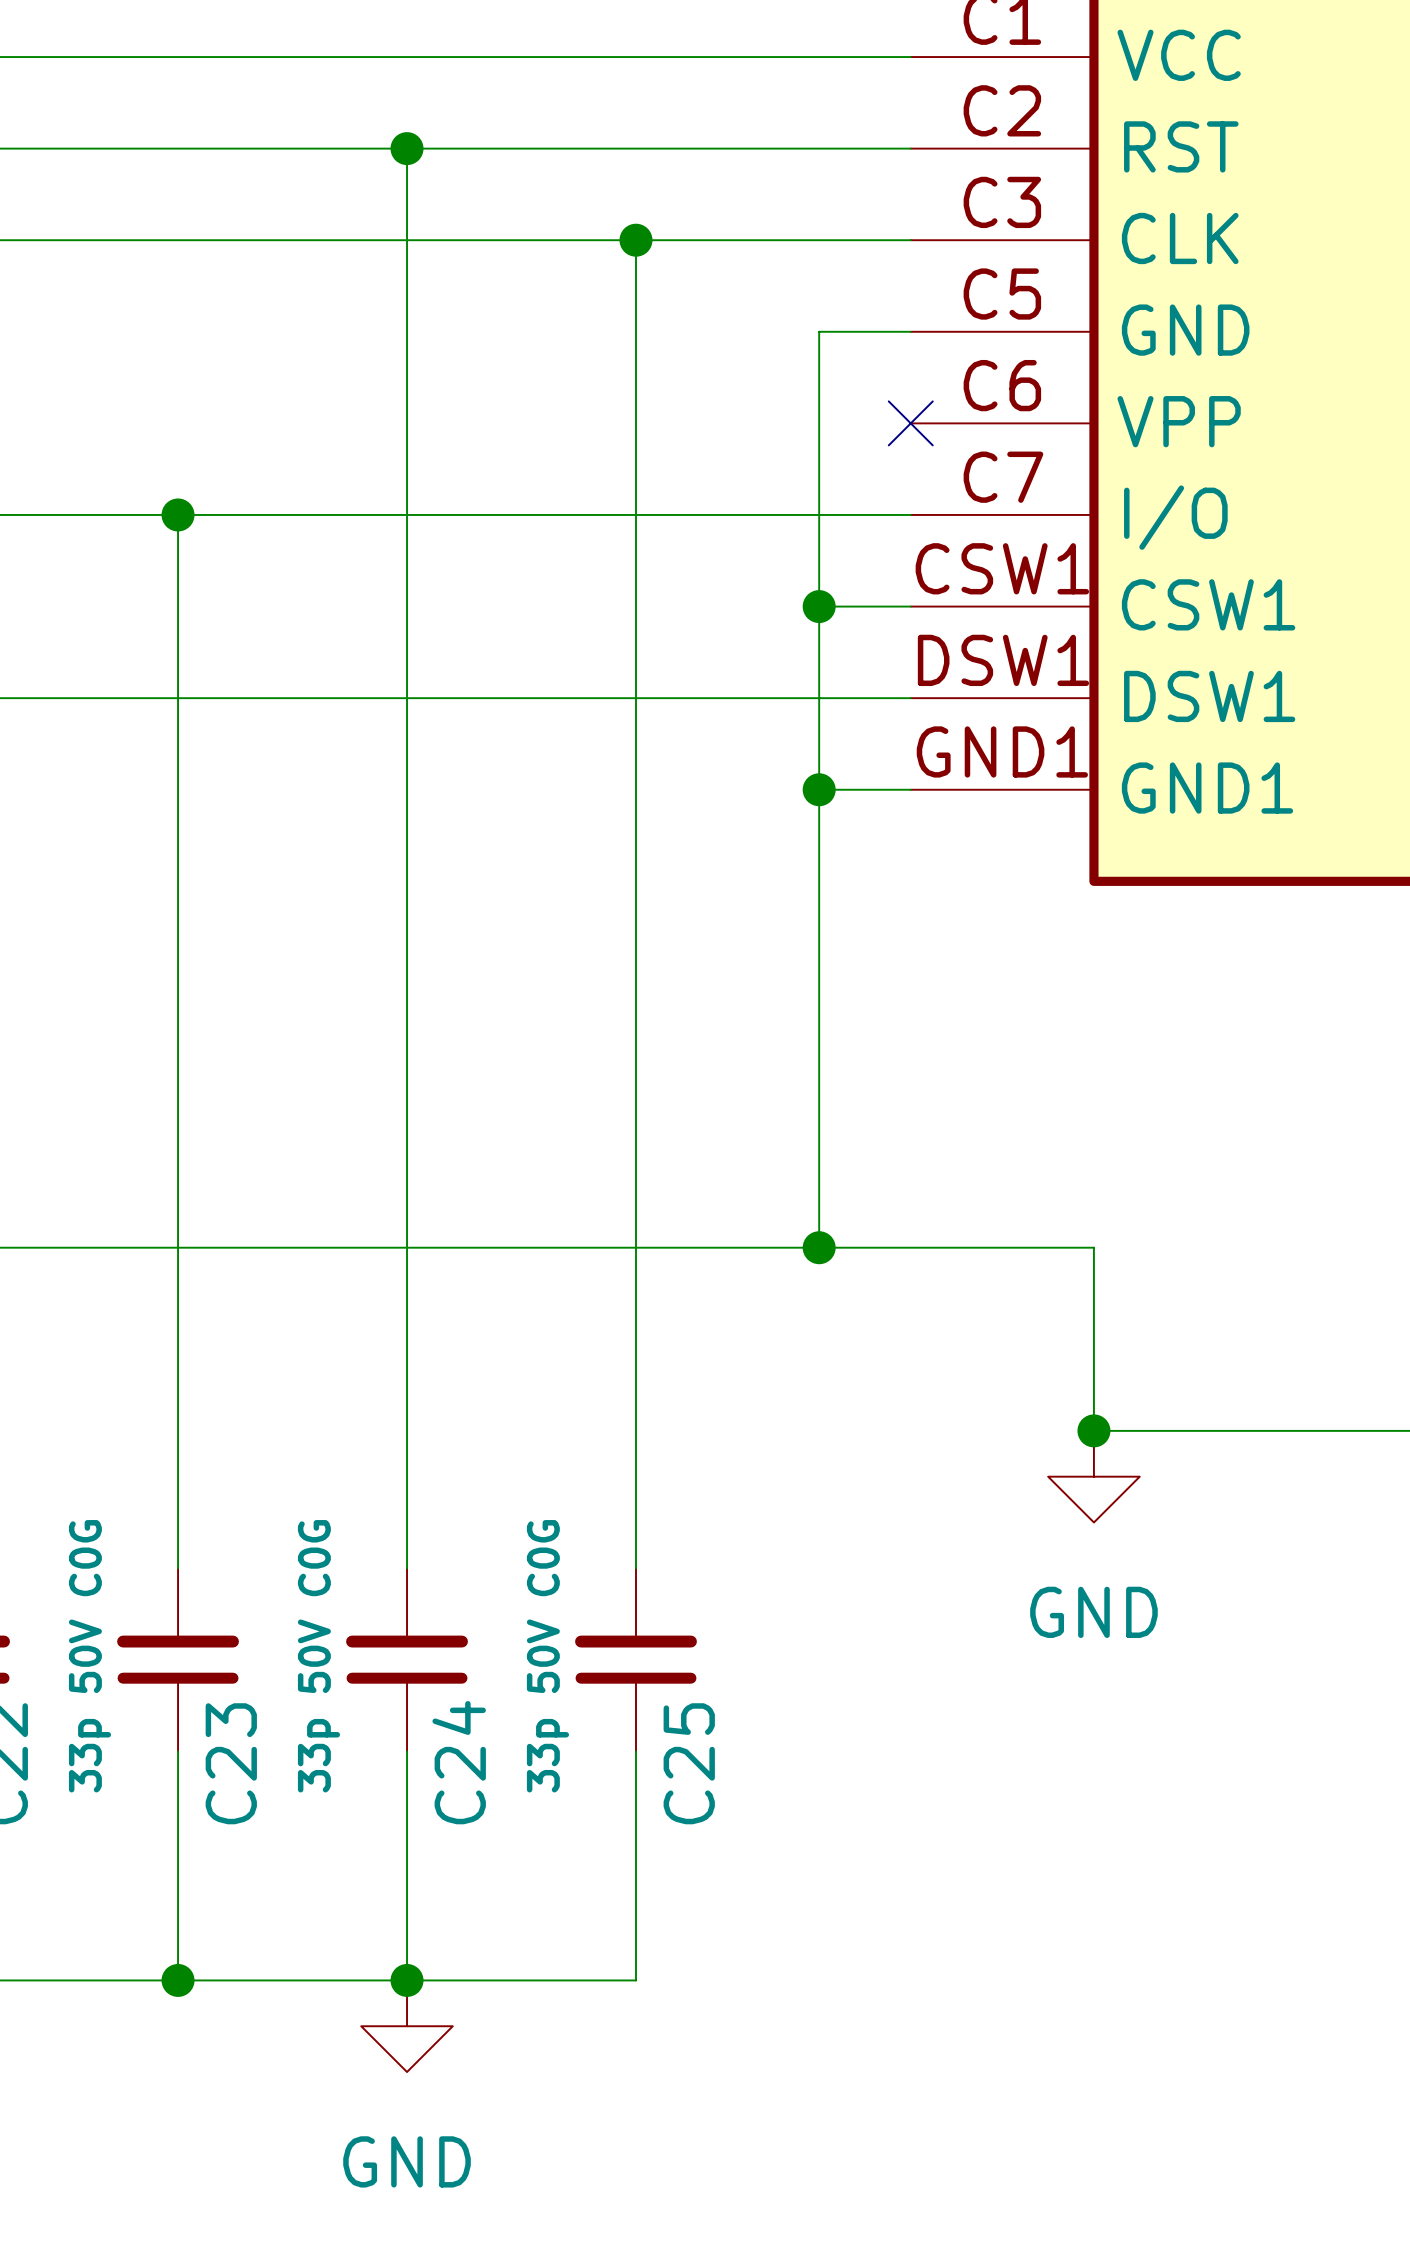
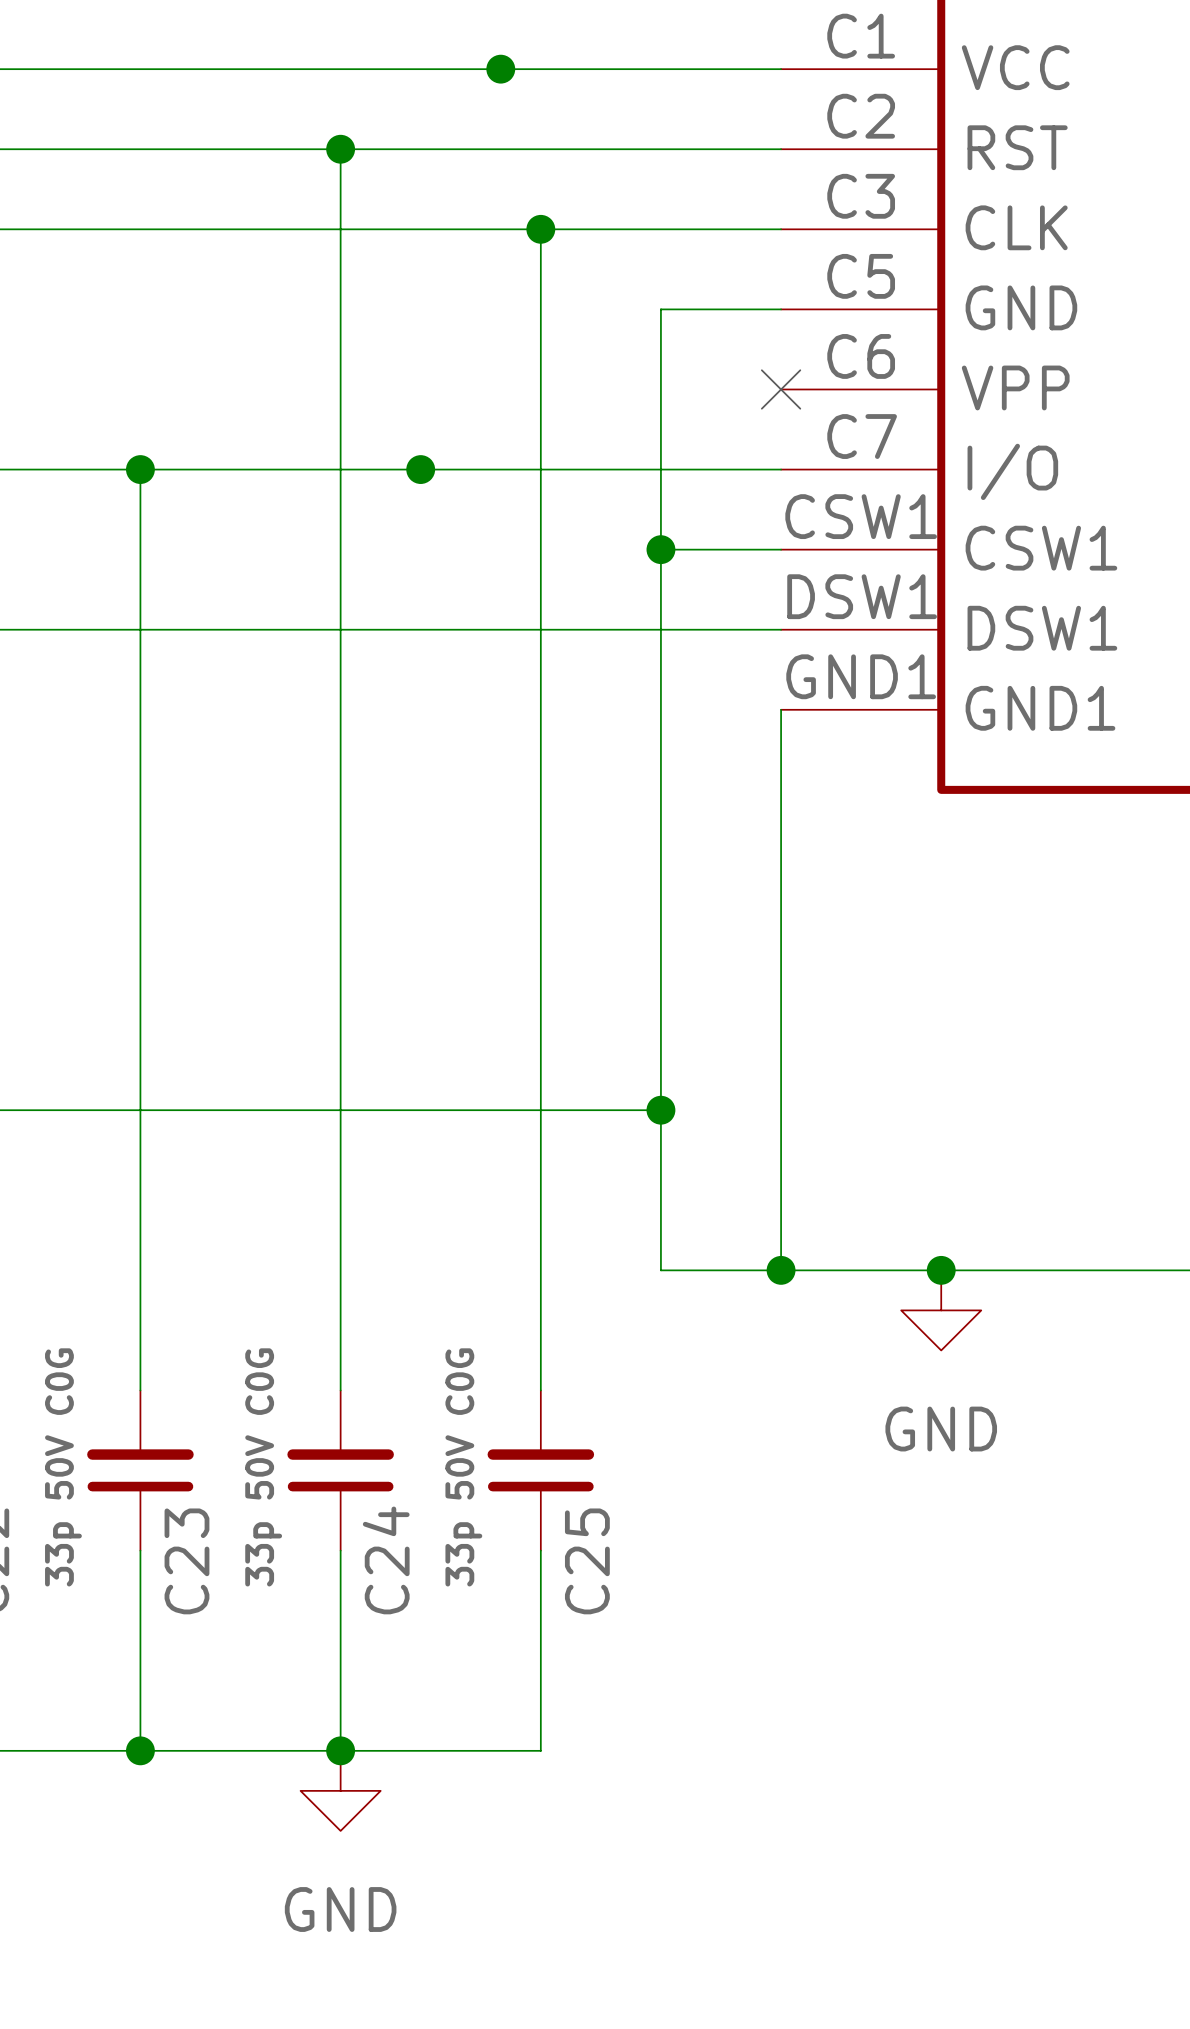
junction: none -> (500, 69)
wire: (819, 331) (819, 1247) -> (700, 309) (660, 309) (660, 1270) (941, 1270)
junction: none -> (420, 469)
wire: none -> (660, 549) (700, 549)
junction position: (819, 606) -> (660, 549)
wire: (819, 789) (910, 789) -> (781, 1270) (781, 709)
junction: (819, 789) -> none
wire: (773, 1247) (1093, 1247) (1093, 1430) -> none
junction position: (819, 1247) -> (660, 1110)
junction: none -> (781, 1270)

